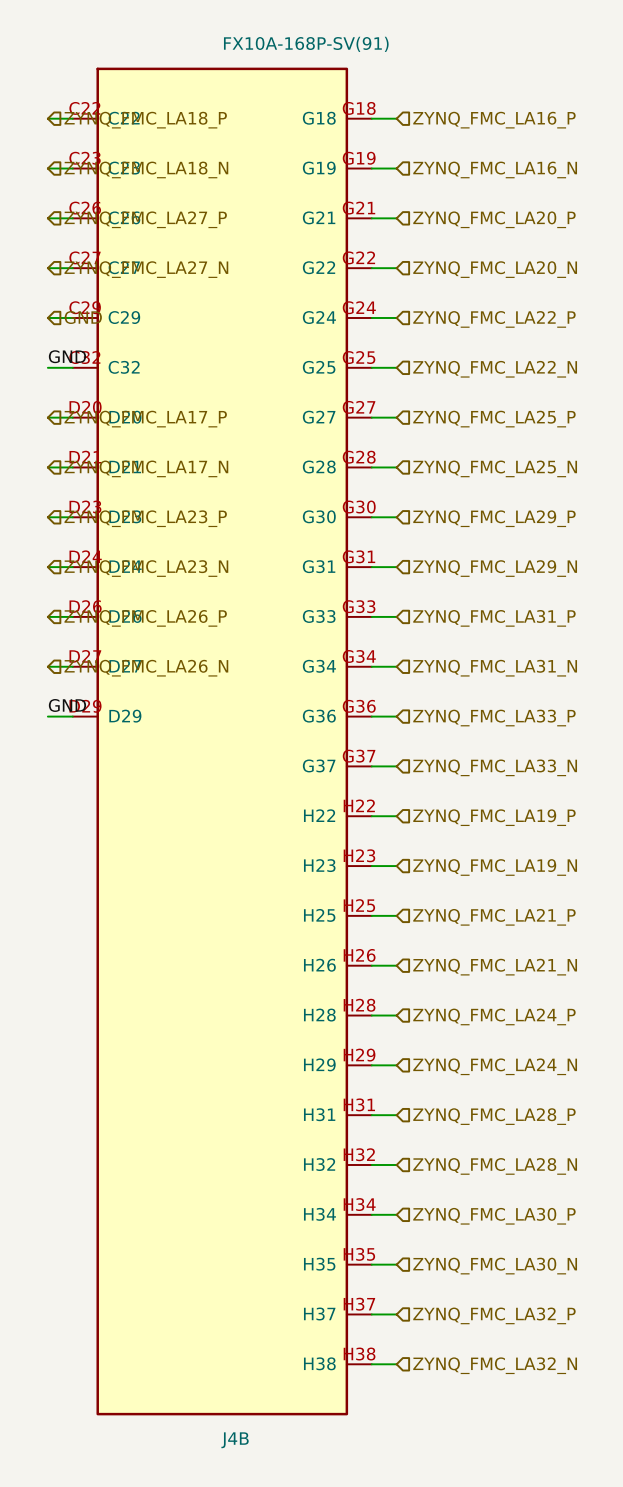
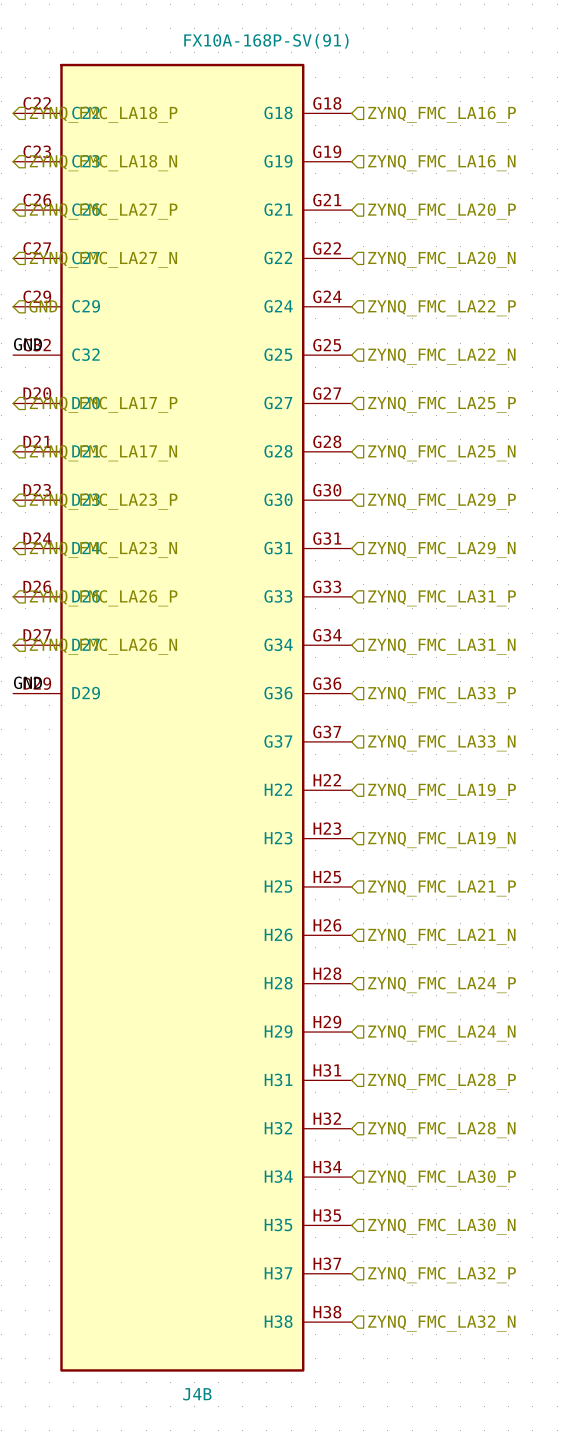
J4B symbol: [72, 67, 372, 1416] -> [13, 63, 352, 1372]

